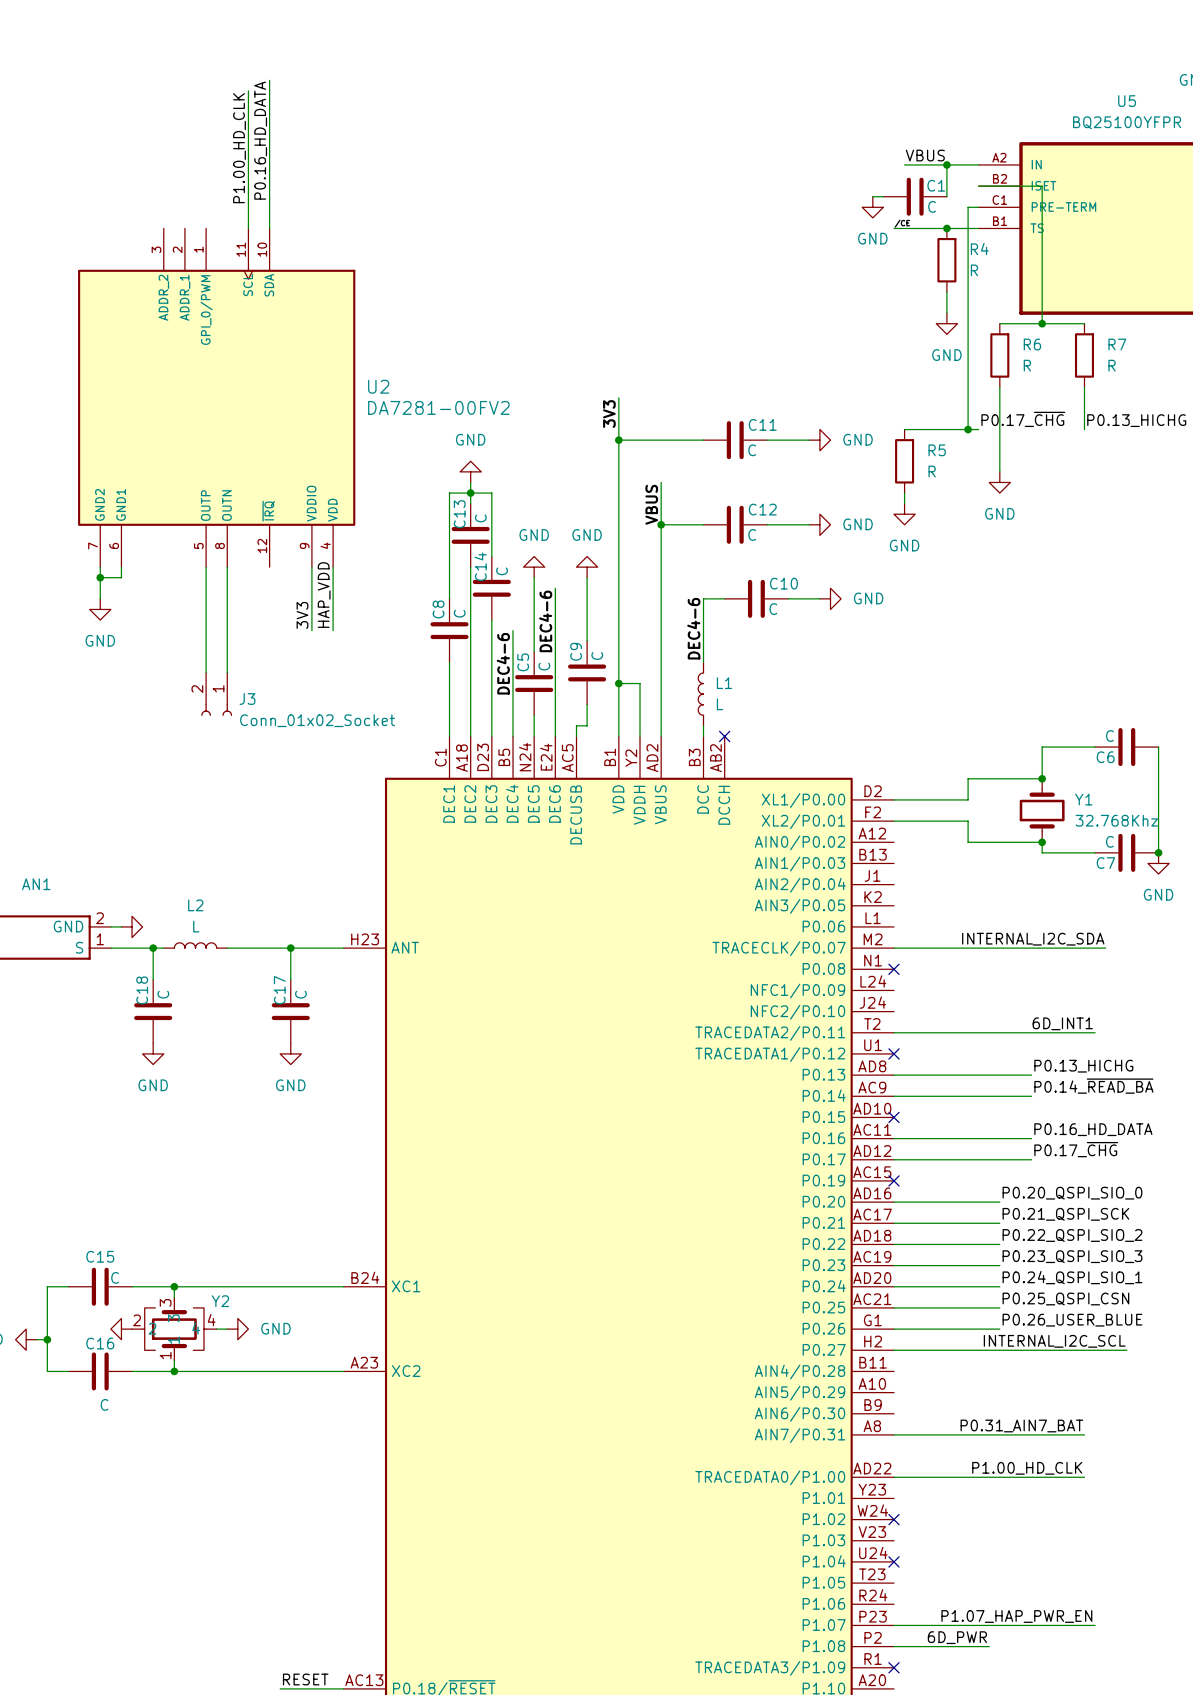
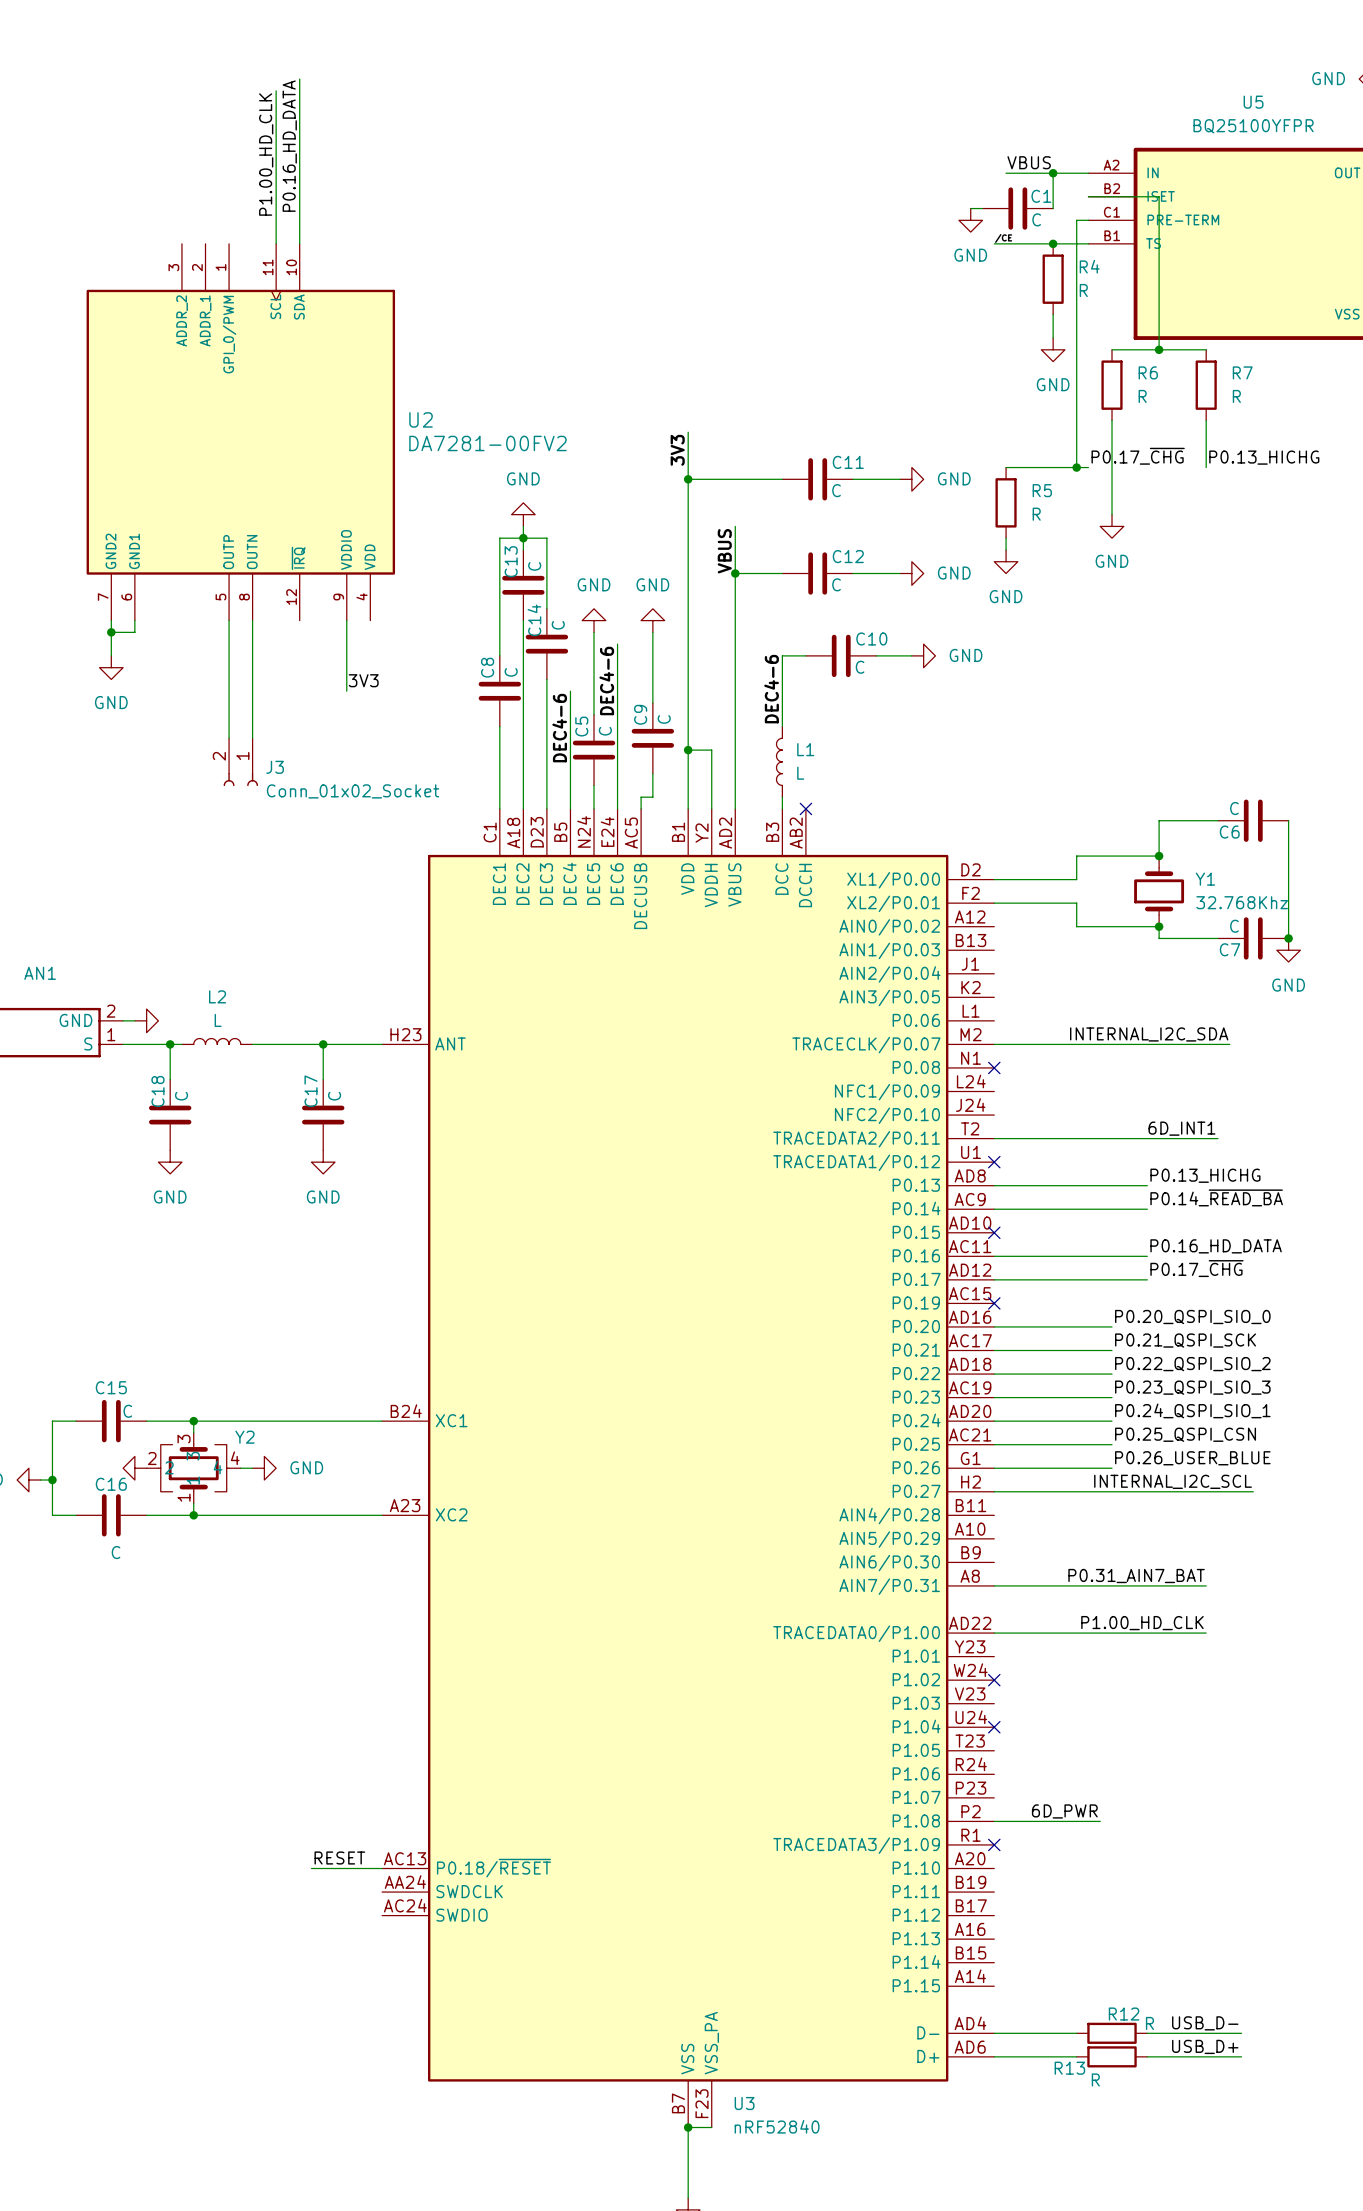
wire: (333, 567) (333, 630) -> none
label: HAP_VDD (324, 595) -> none
label rotation: 0° (302, 615) -> 90° clockwise (363, 680)
label: P1.07_HAP_PWR_EN (1016, 1616) -> none
wire: (893, 1625) (1095, 1625) -> none

